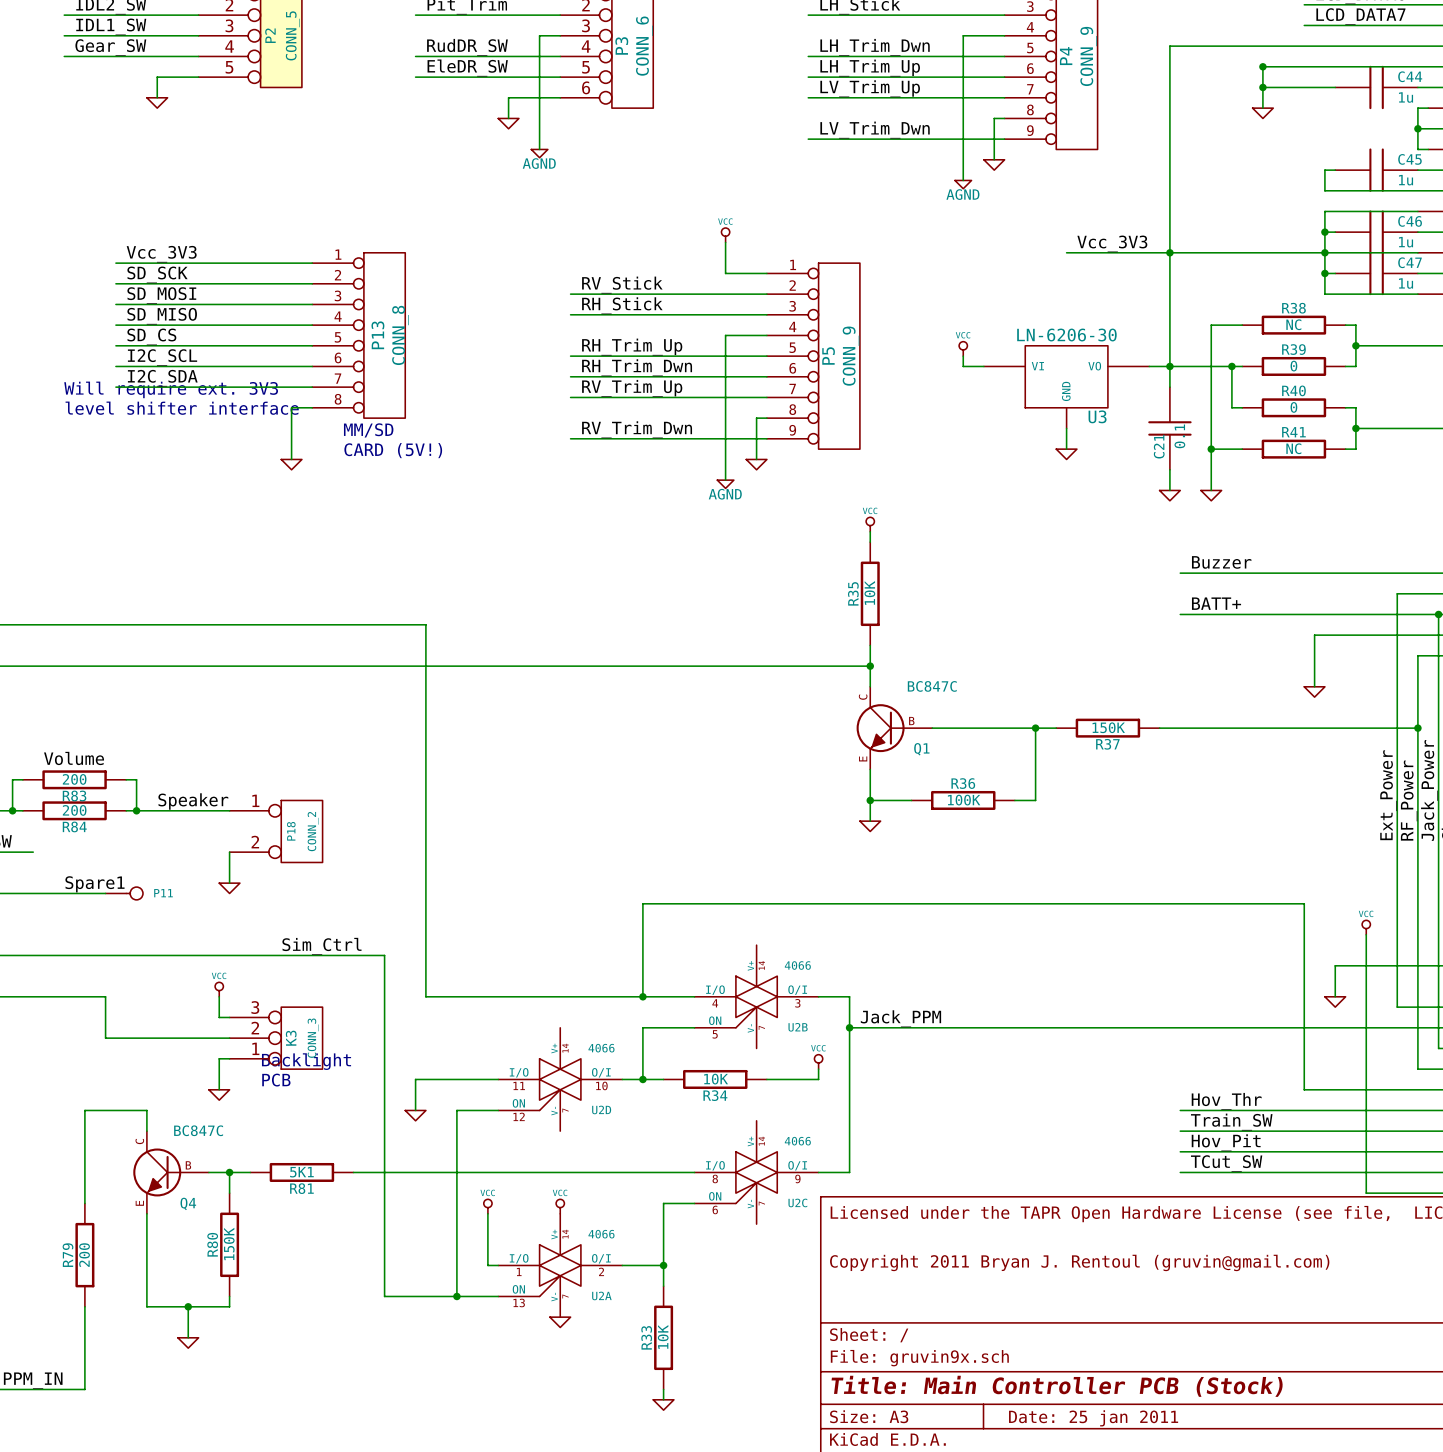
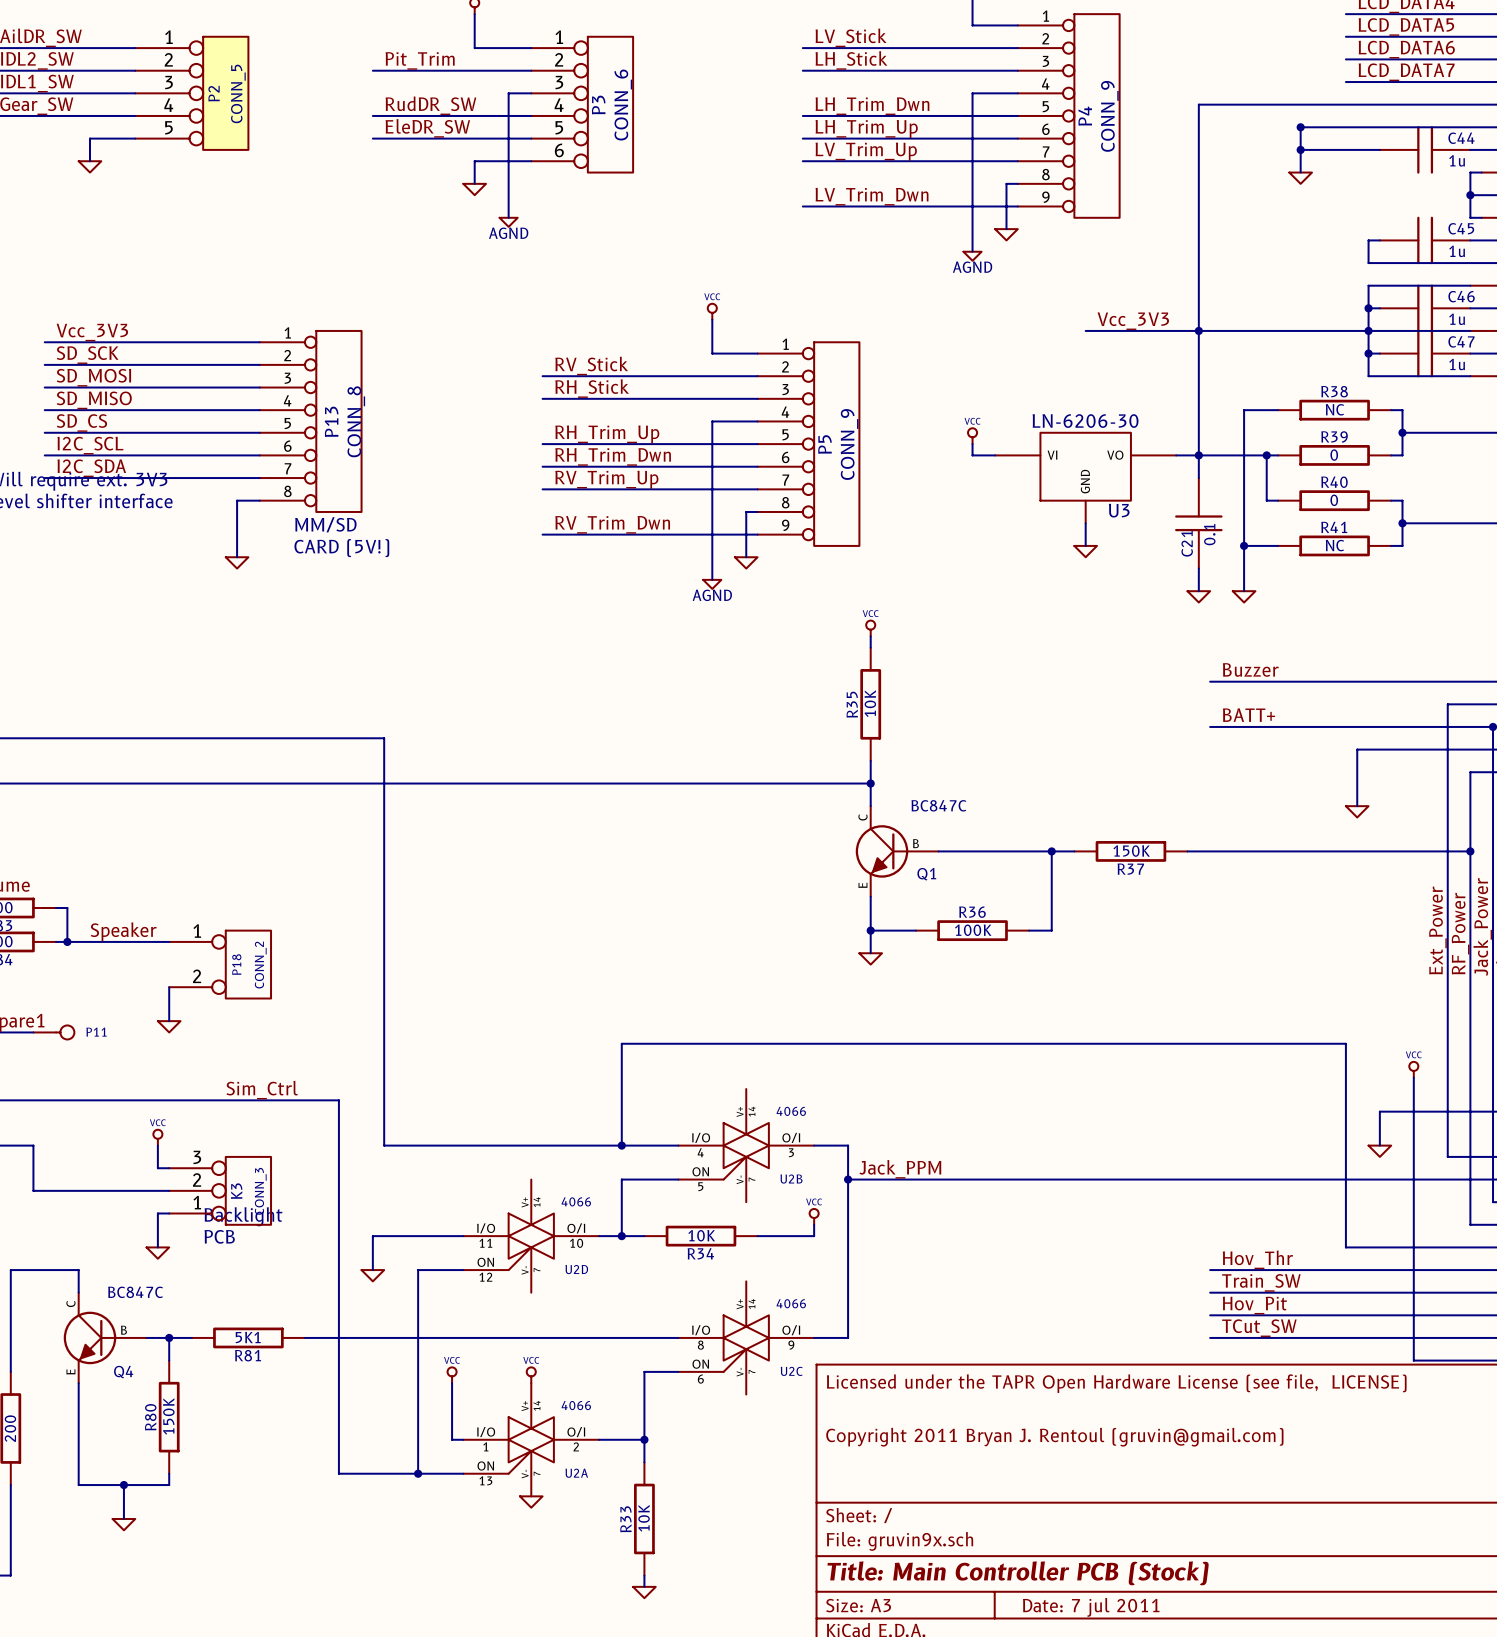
title block: Date: 25 jan 2011 (1093, 1418) -> Date: 7 jul 2011 (1091, 1607)

